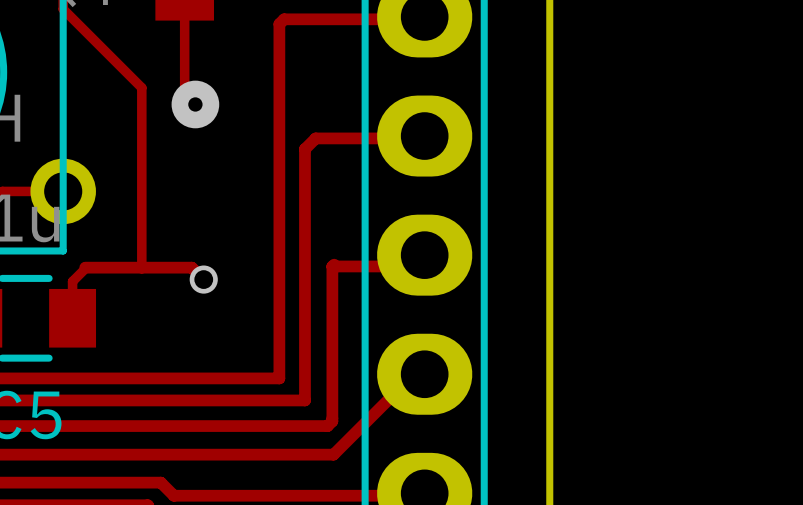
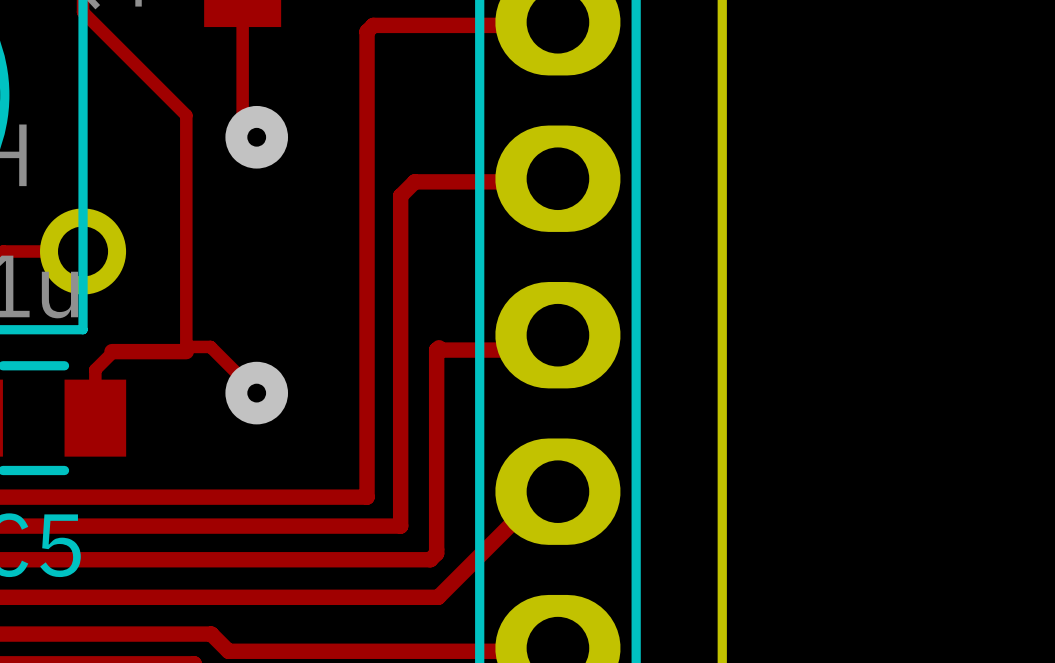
track: none -> (186, 346) (210, 346) (256, 393)
via size: [189, 265, 218, 294] -> [225, 361, 289, 425]
track: (141, 267) (191, 267) (203, 279) -> none

